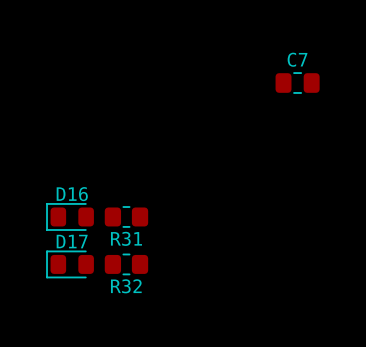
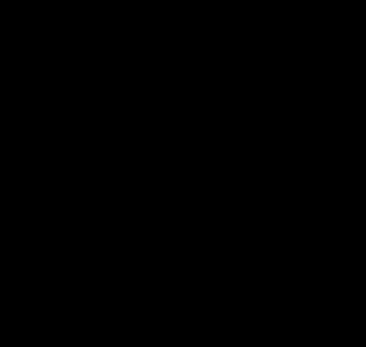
C7: (297, 83) -> none
D16: (70, 216) -> none
R31: (126, 216) -> none
D17: (70, 264) -> none
R32: (126, 264) -> none

